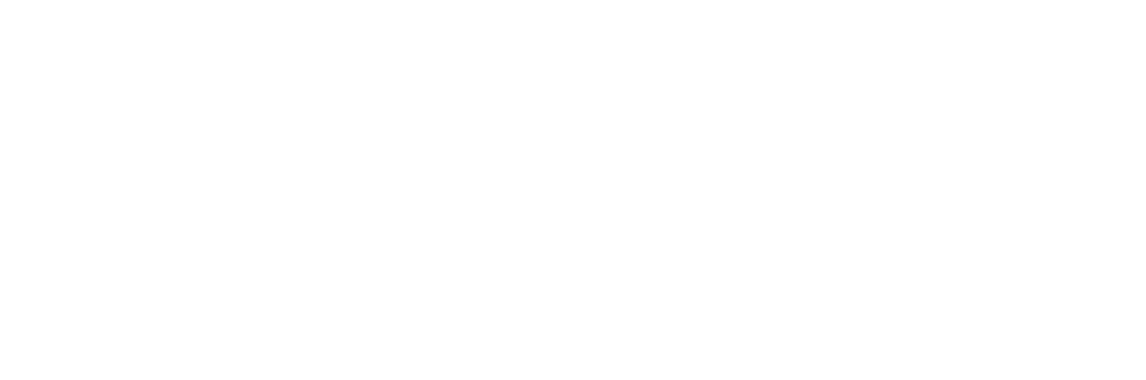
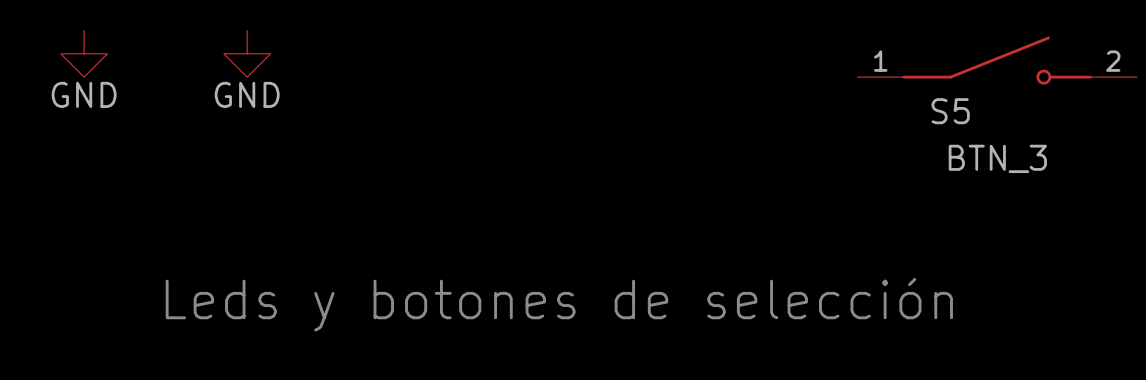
power symbol: none -> GND (84, 53)
power symbol: none -> GND (247, 53)
S5: none -> BTN_3 (997, 60)
text: none -> Leds y botones de selección (559, 304)

